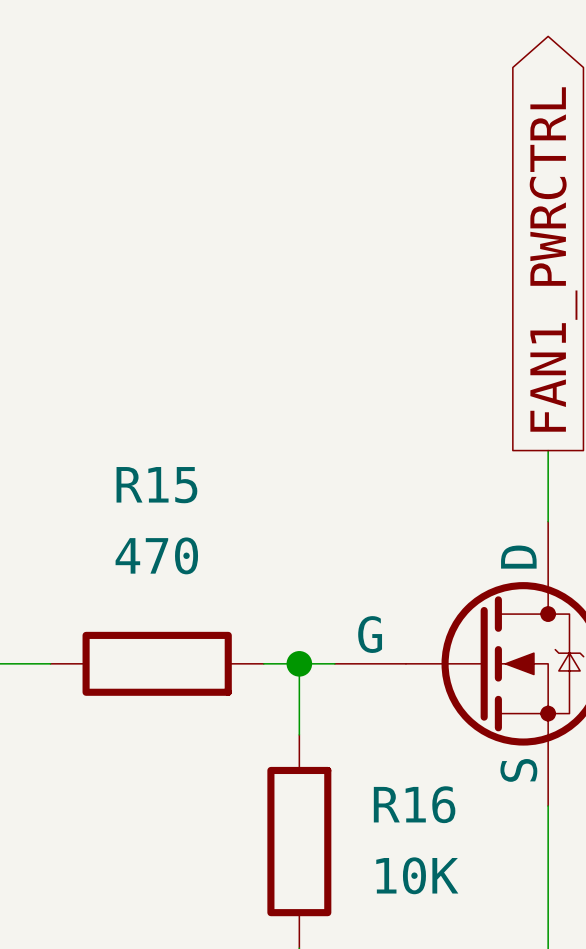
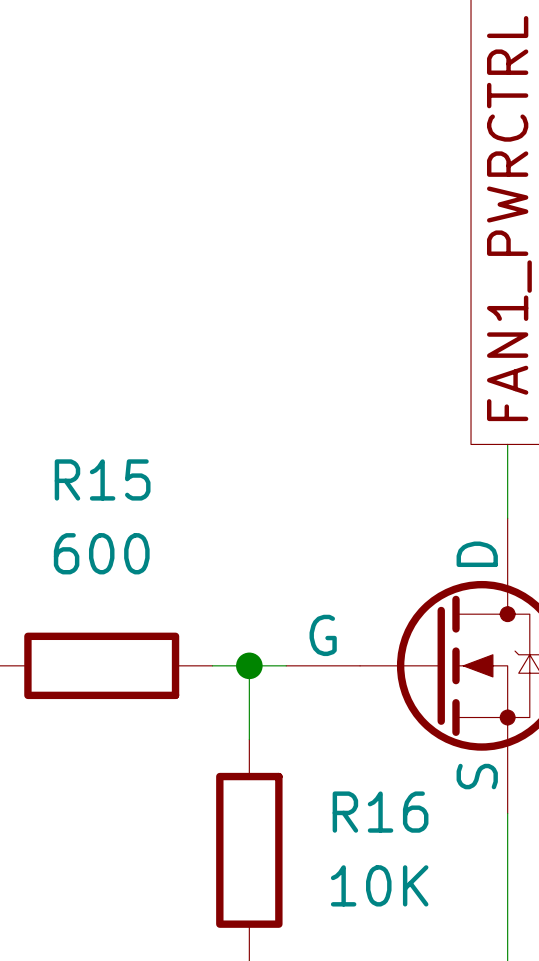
R15 value: 470 (156, 555) -> 600 (101, 553)

